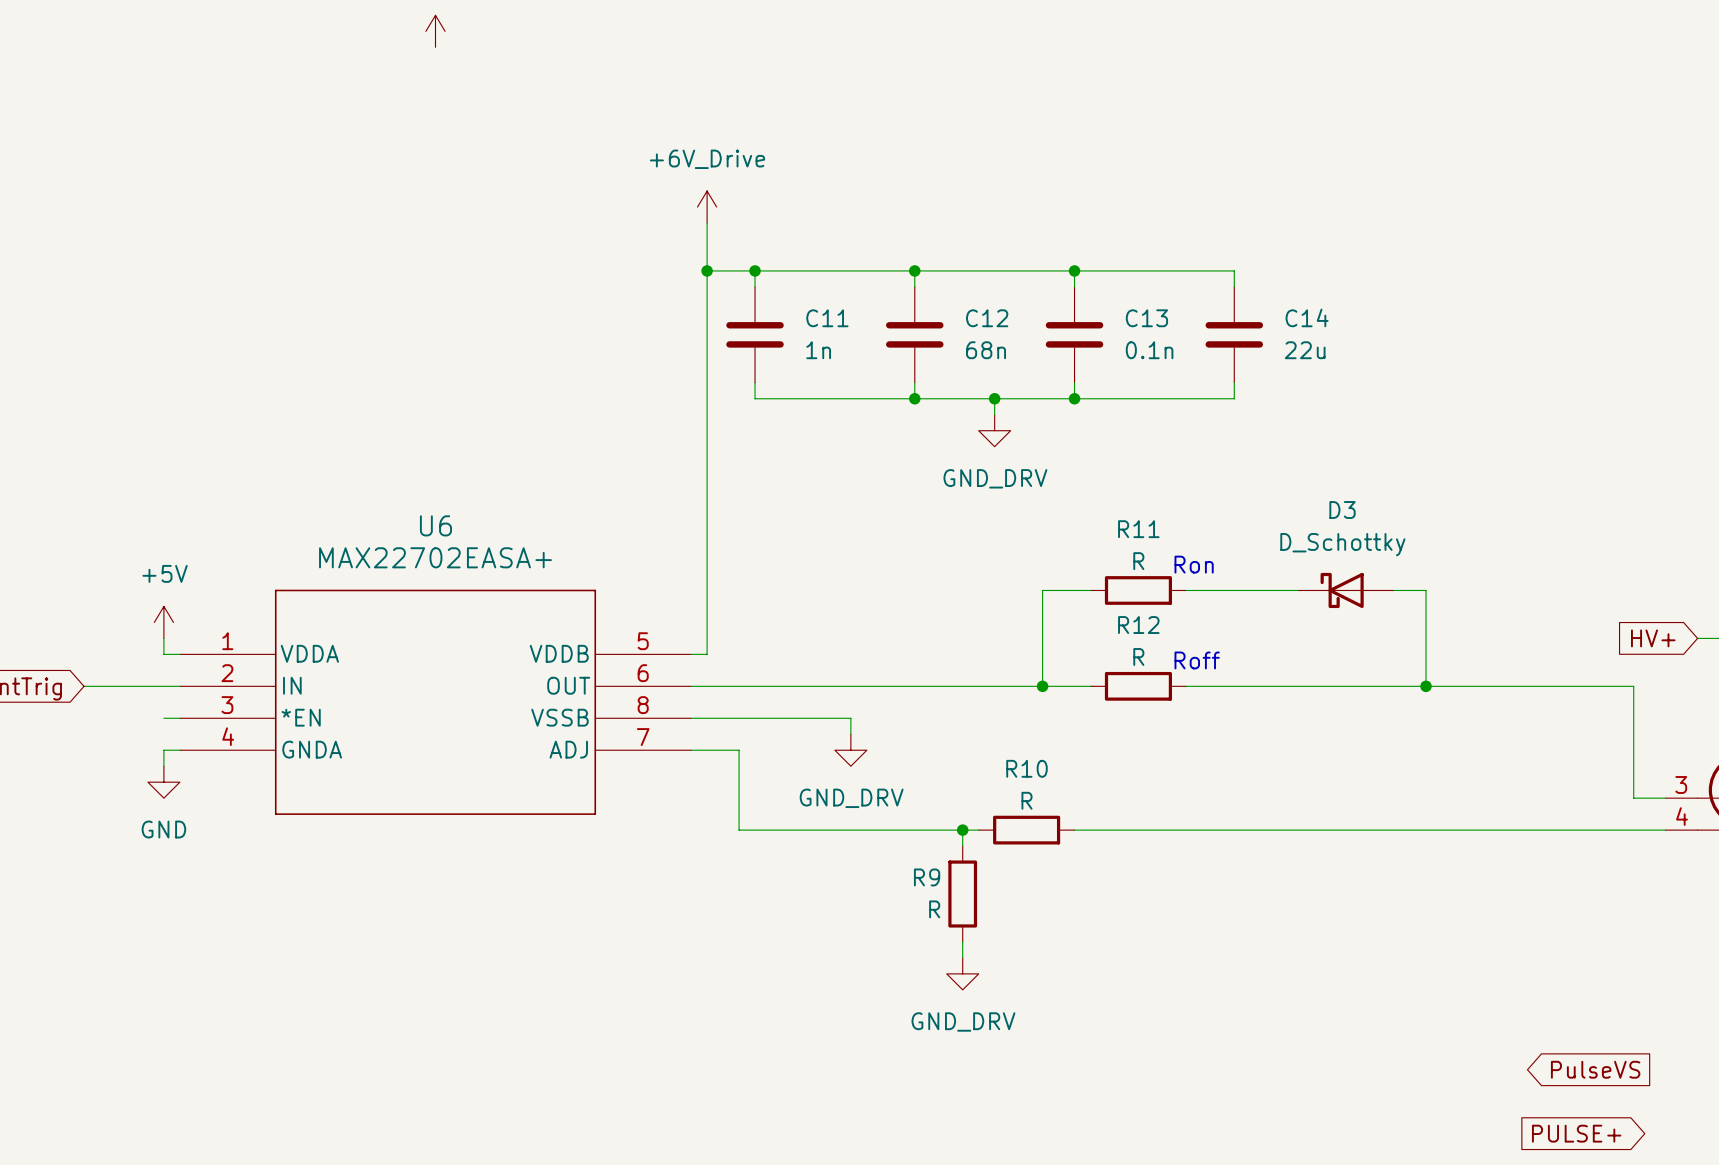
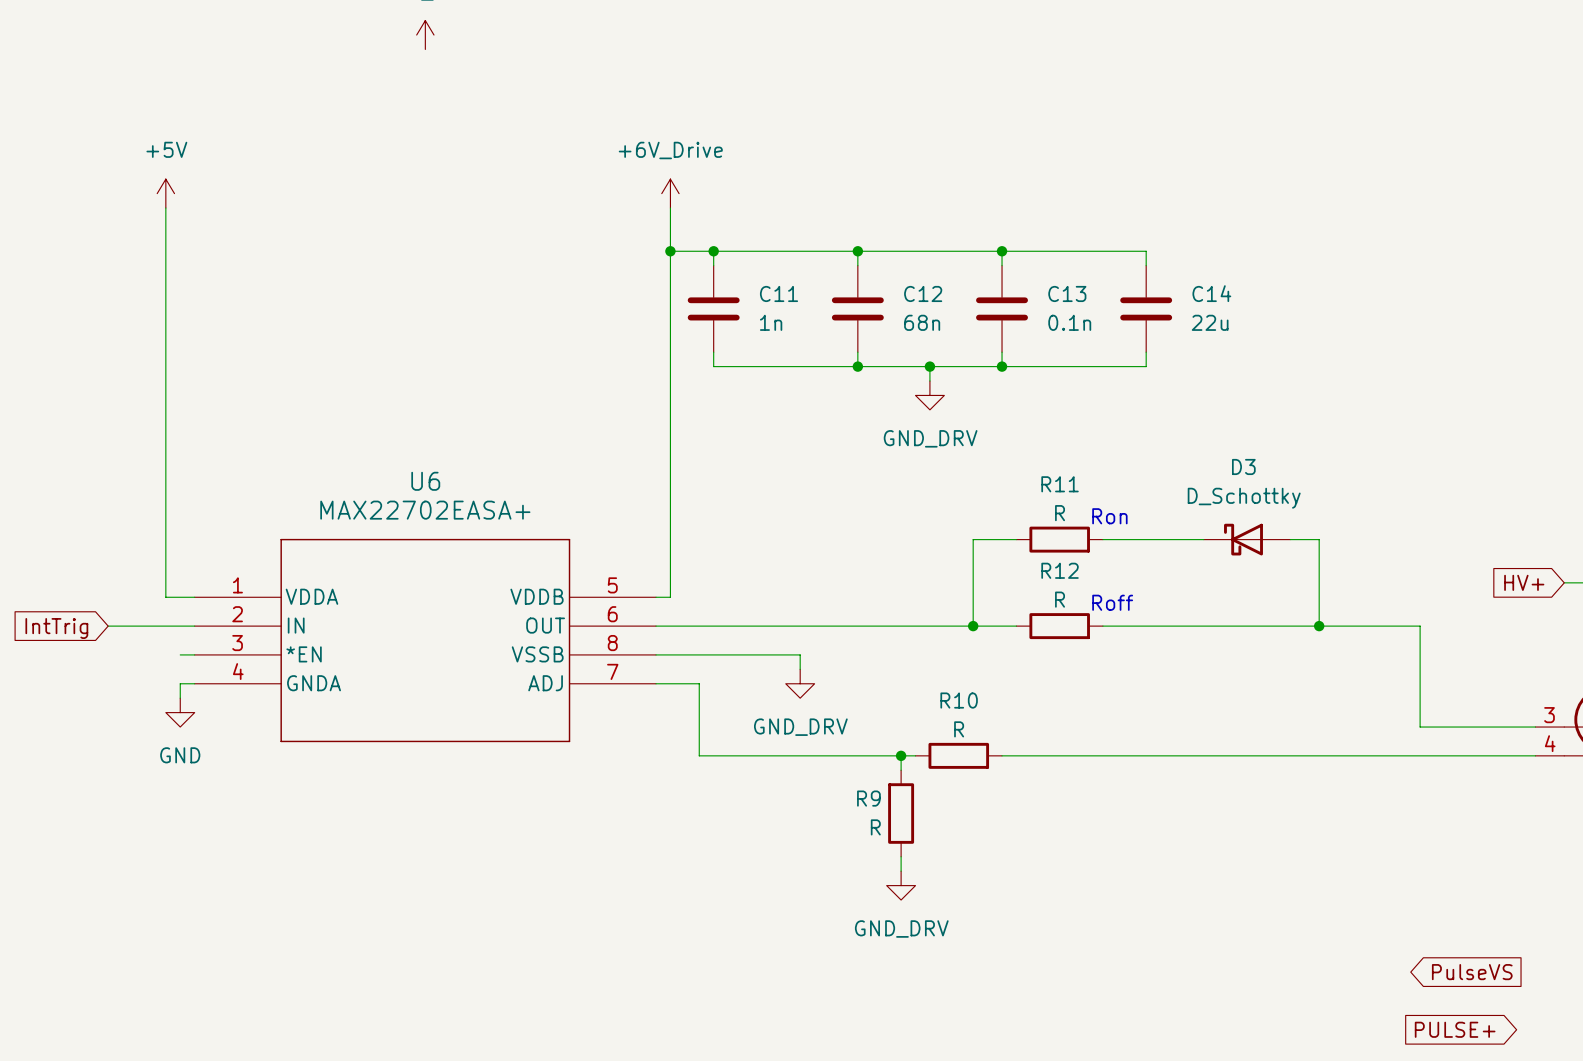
power symbol: none -> +5V (165, 193)
power symbol: +5V (163, 622) -> none
wire: (163, 638) (163, 654) -> (165, 208) (165, 597) (180, 597)
wire: (1537, 686) (1633, 686) (1633, 798) -> (1420, 626) (1420, 727) (1506, 727)

